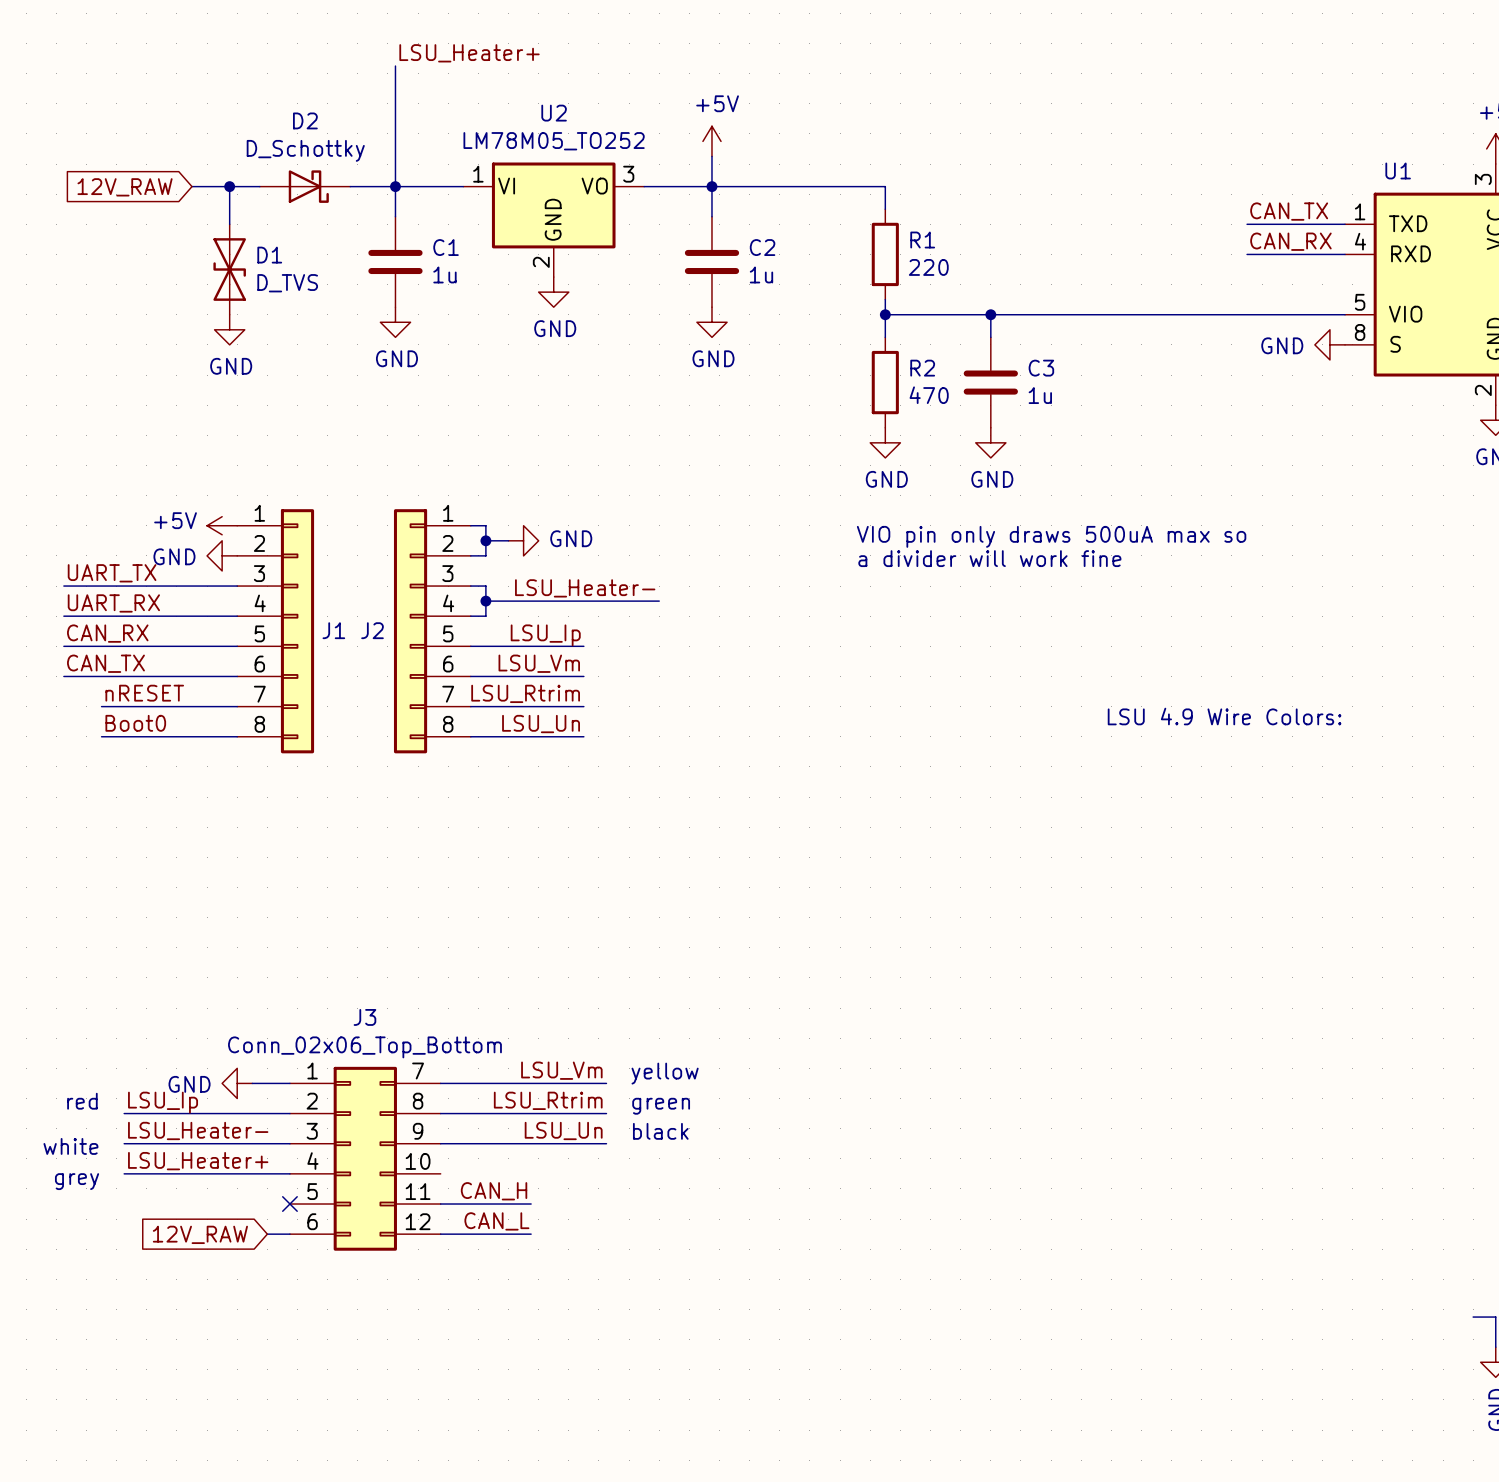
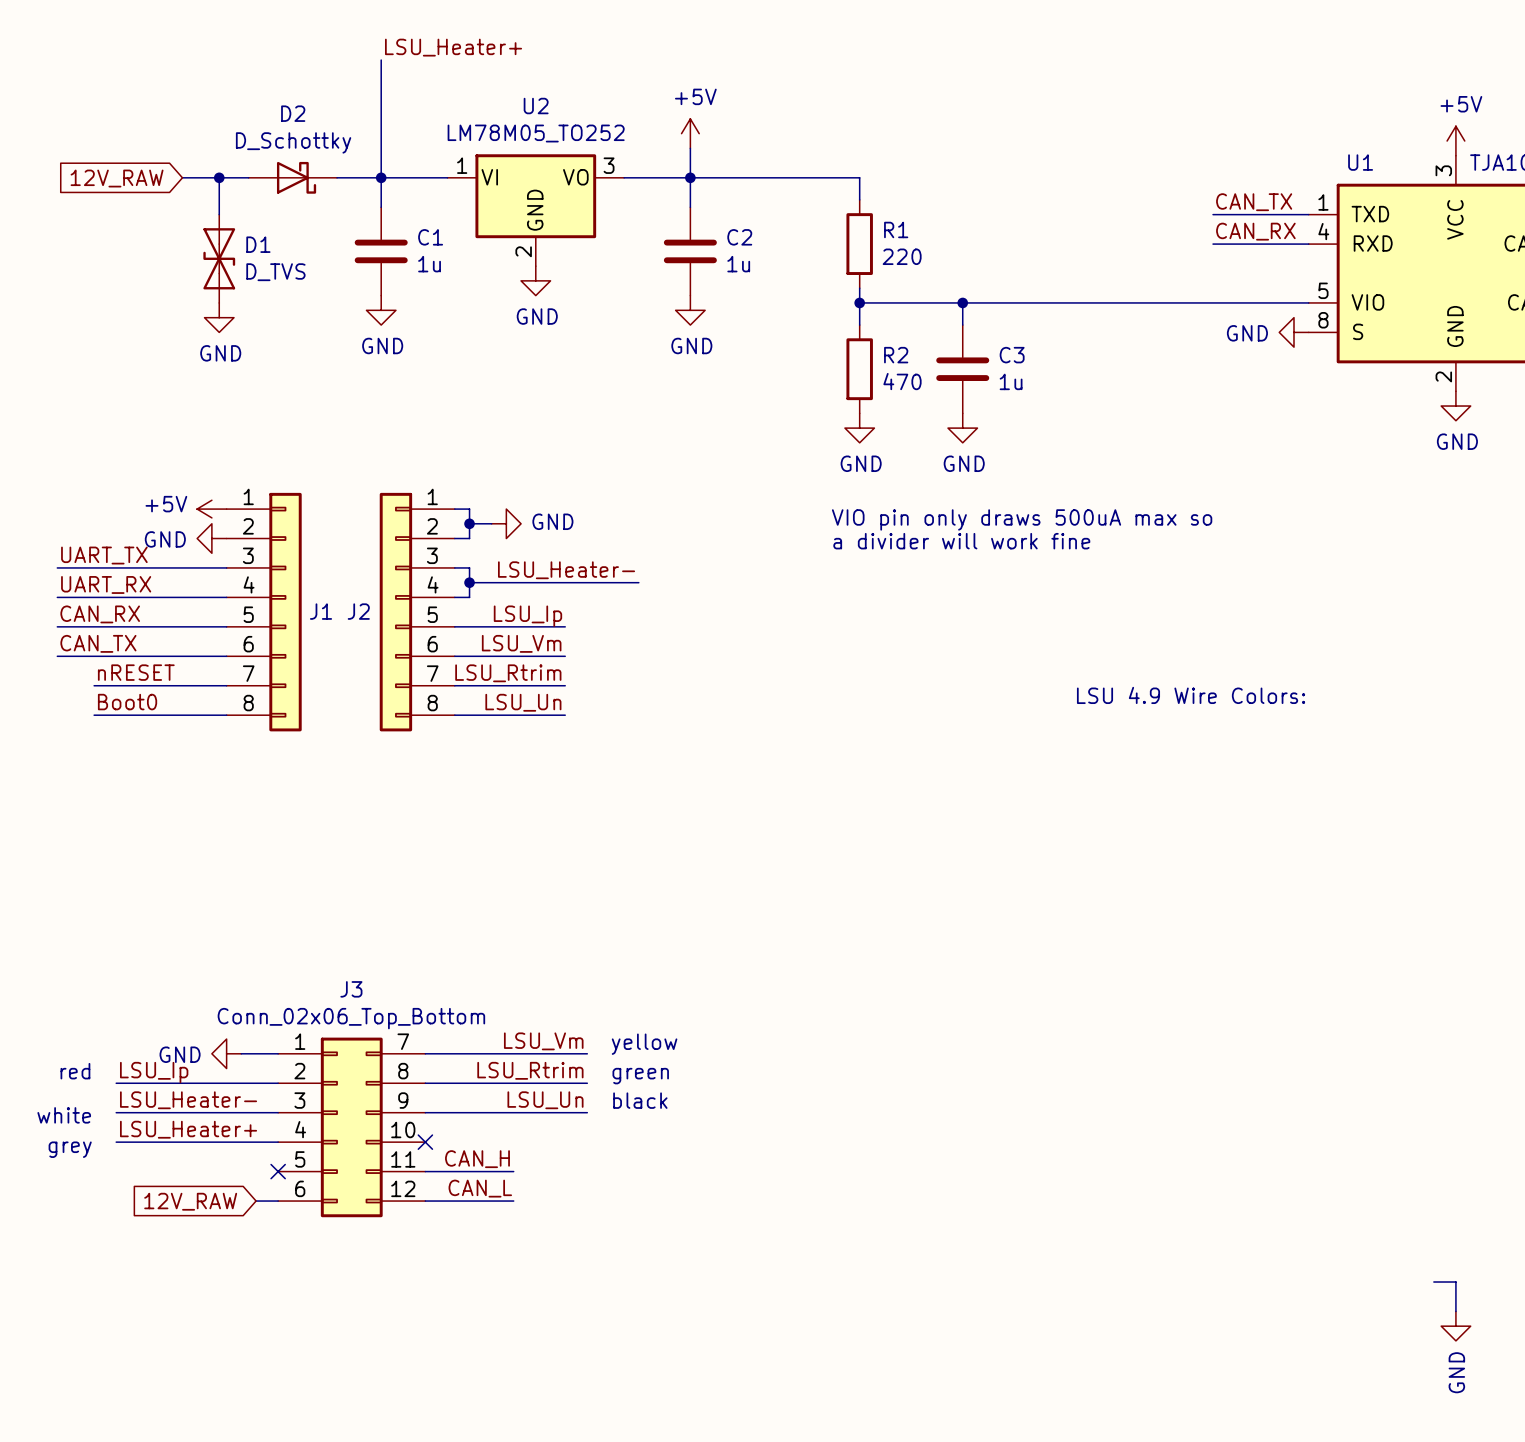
no-connect mark: none -> (425, 1142)

